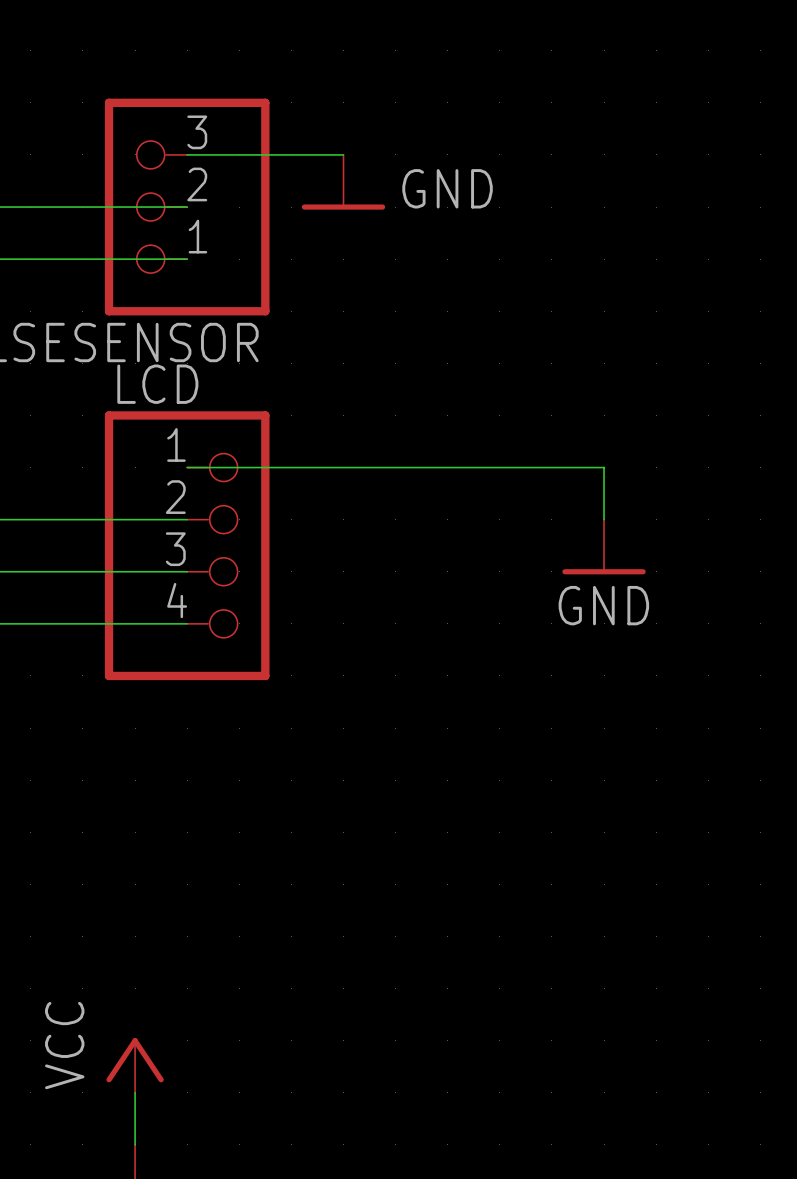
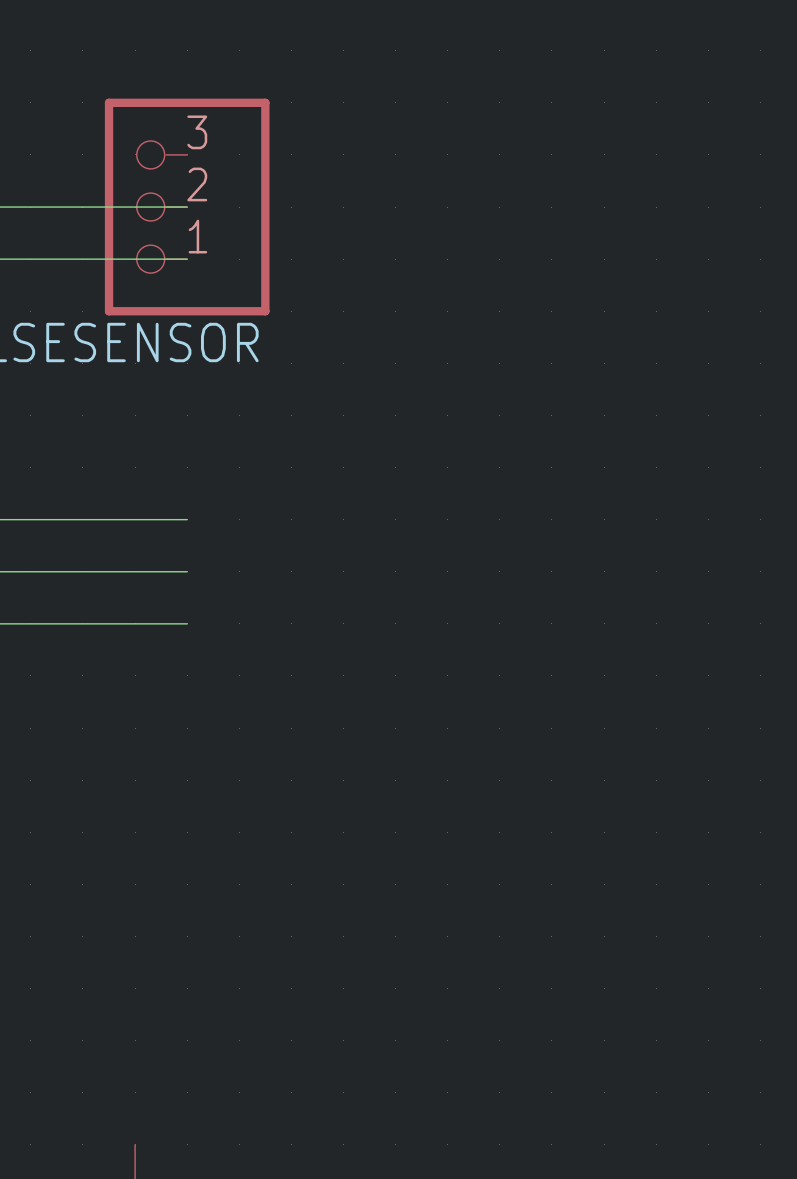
wire: (187, 154) (343, 154) -> none
power symbol: GND (343, 182) -> none
wire: (187, 467) (604, 467) (604, 519) -> none
LCD: (187, 545) -> none
power symbol: GND (604, 547) -> none
power symbol: VCC (135, 1065) -> none
wire: (135, 1092) (135, 1144) -> none

